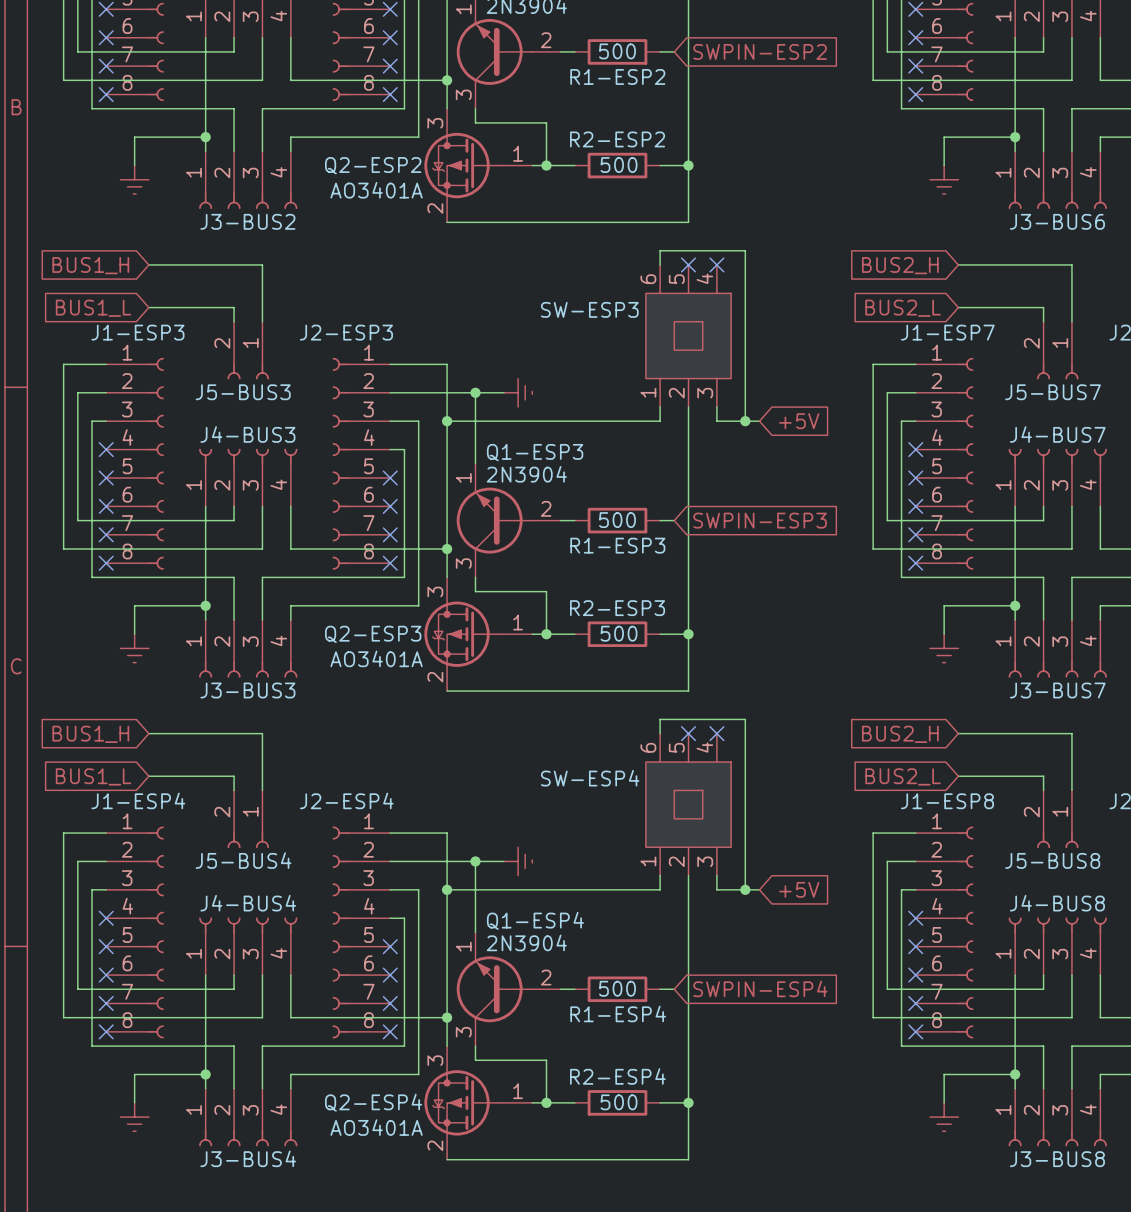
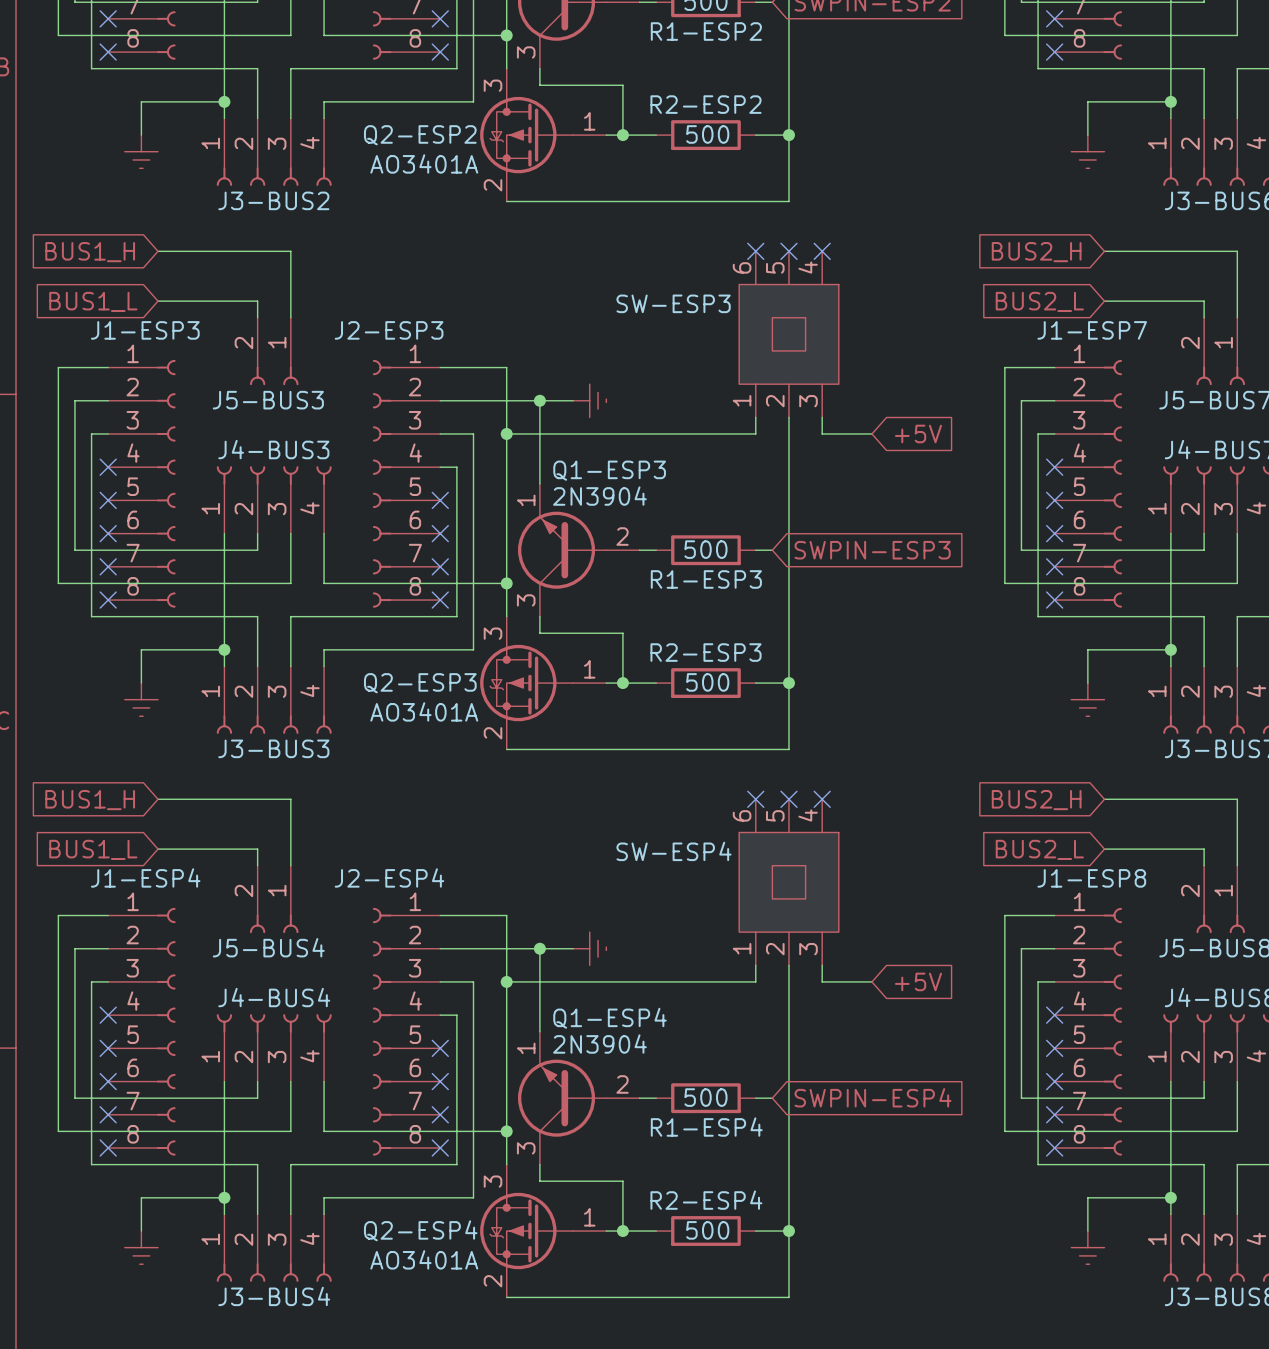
wire: (660, 264) (660, 250) (745, 250) (745, 421) -> none
no-connect mark: none -> (755, 251)
junction: (745, 421) -> none
wire: (660, 733) (660, 719) (745, 719) (745, 889) -> none
no-connect mark: none -> (755, 799)
junction: (745, 889) -> none

